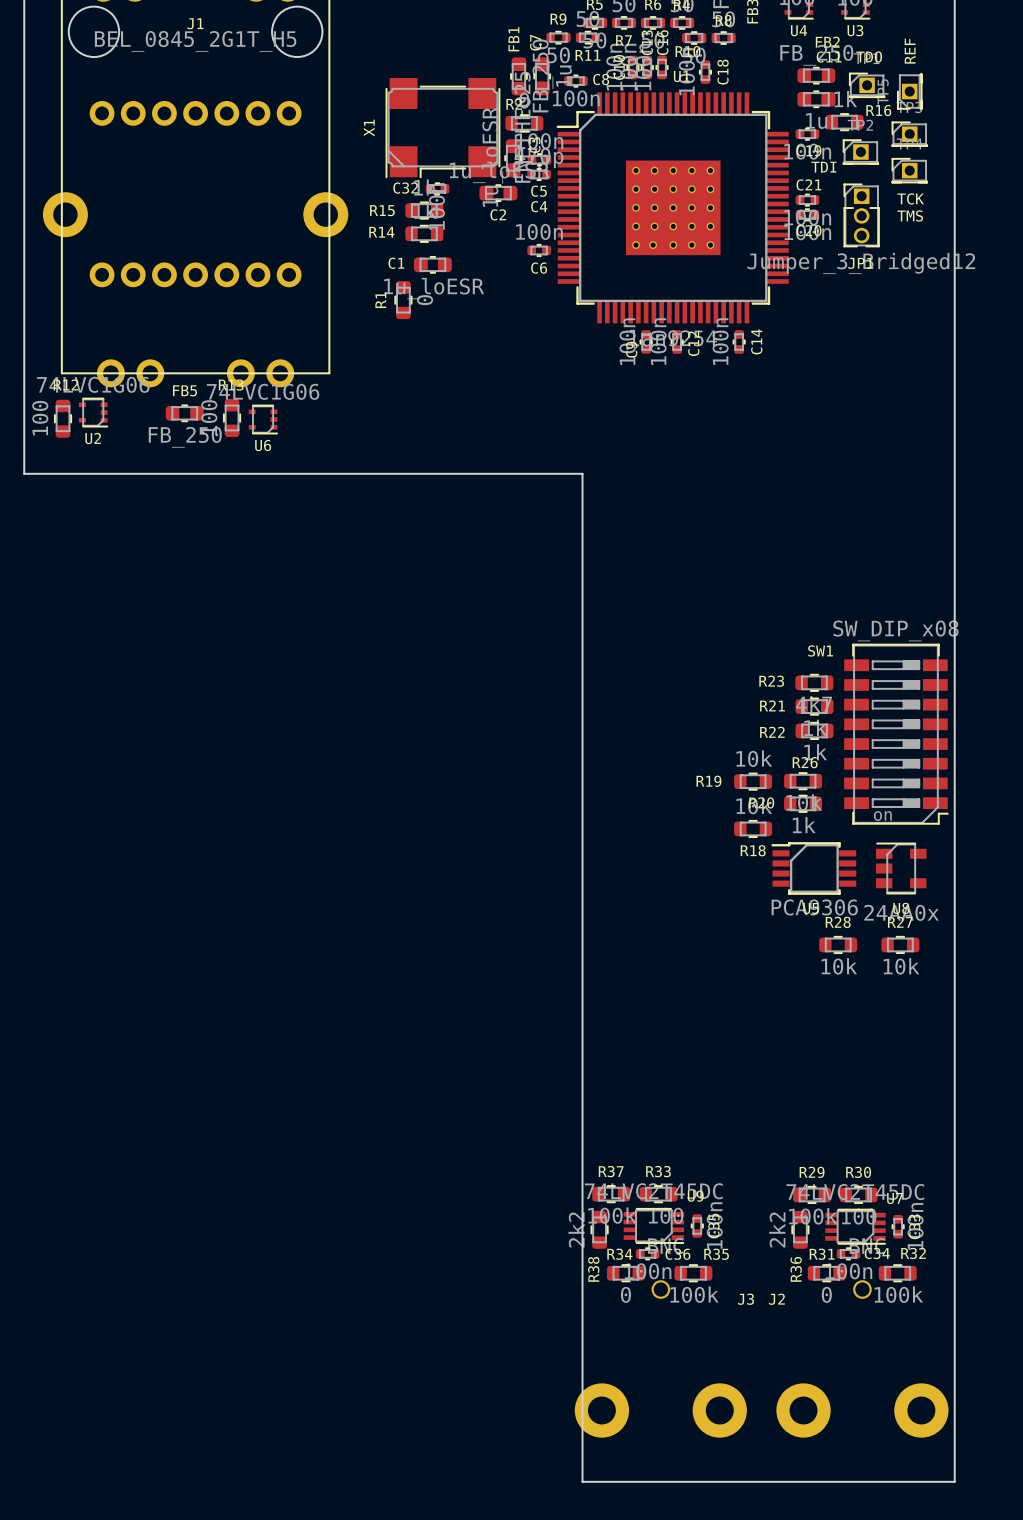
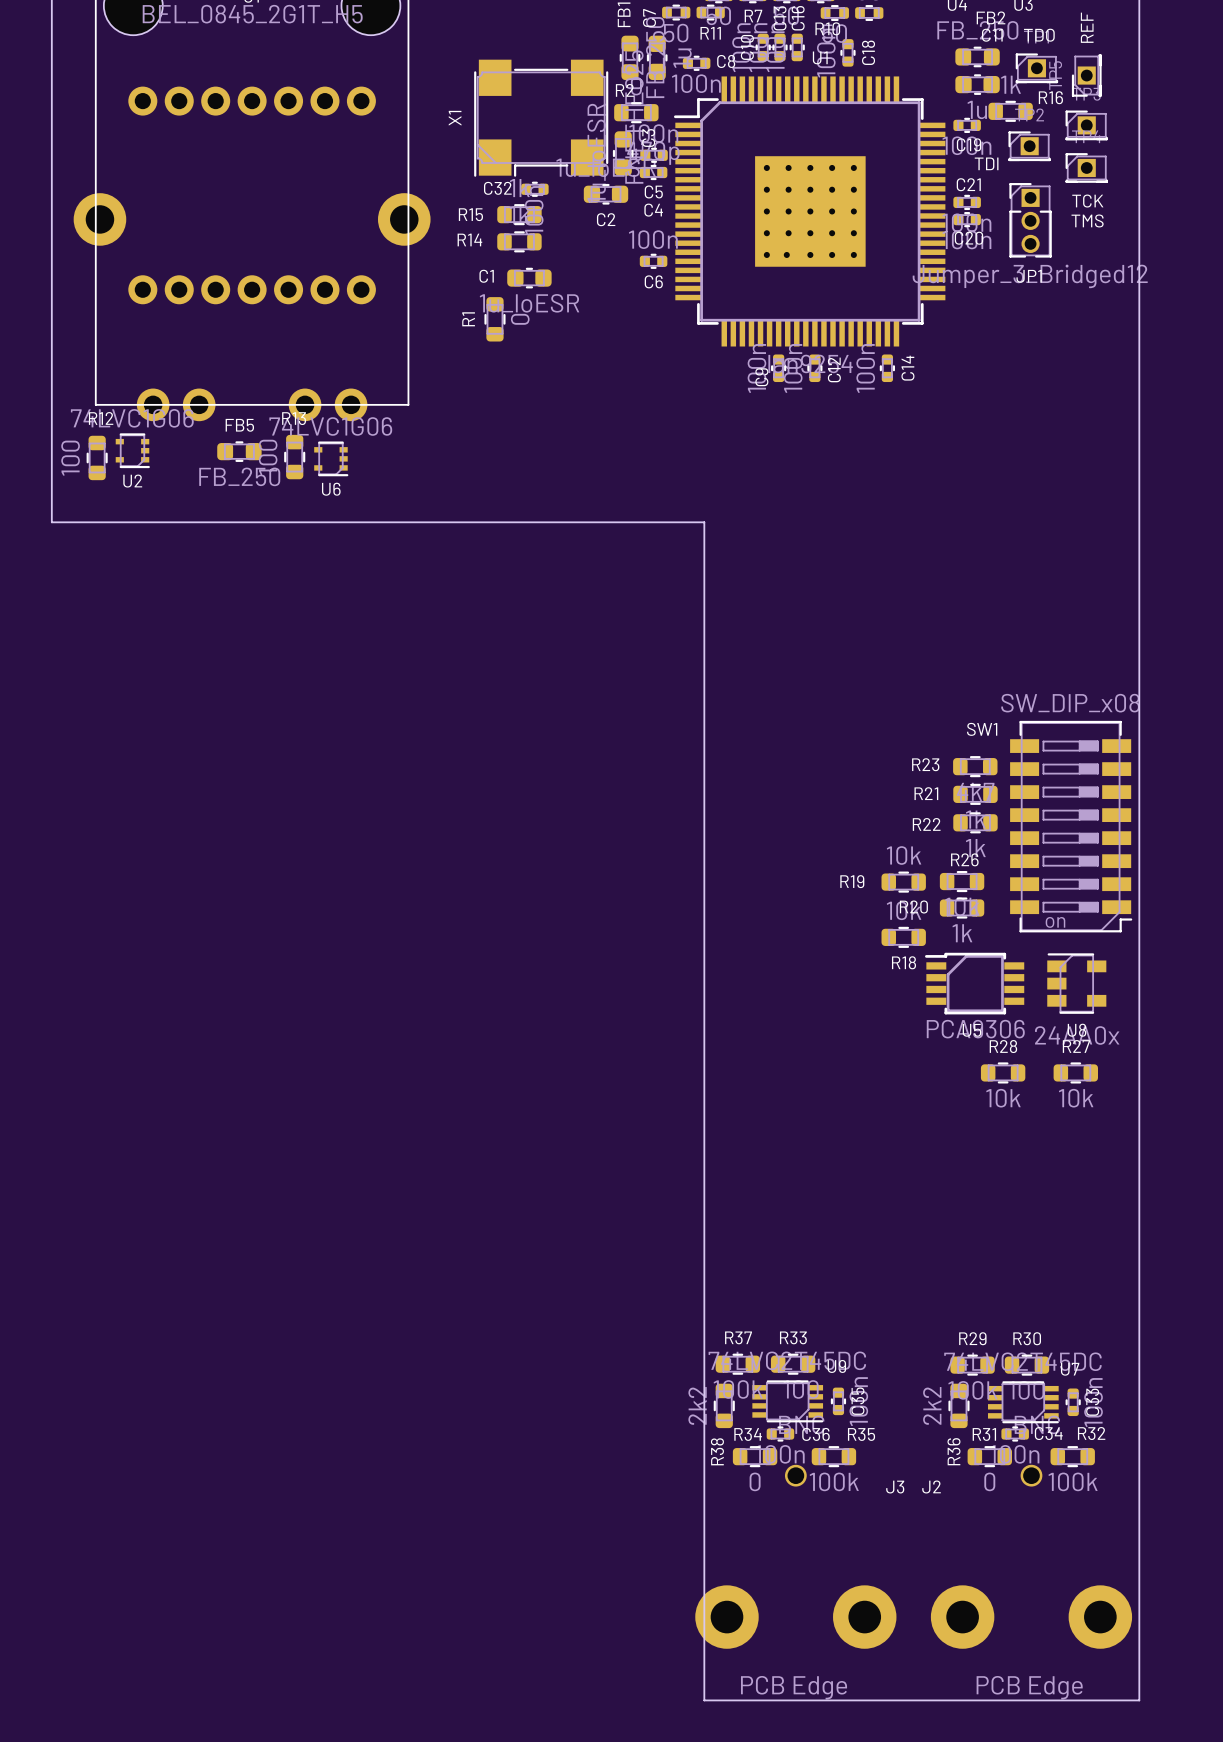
J3 text: none -> PCB Edge (794, 1687)
J2 text: none -> PCB Edge (1029, 1687)

